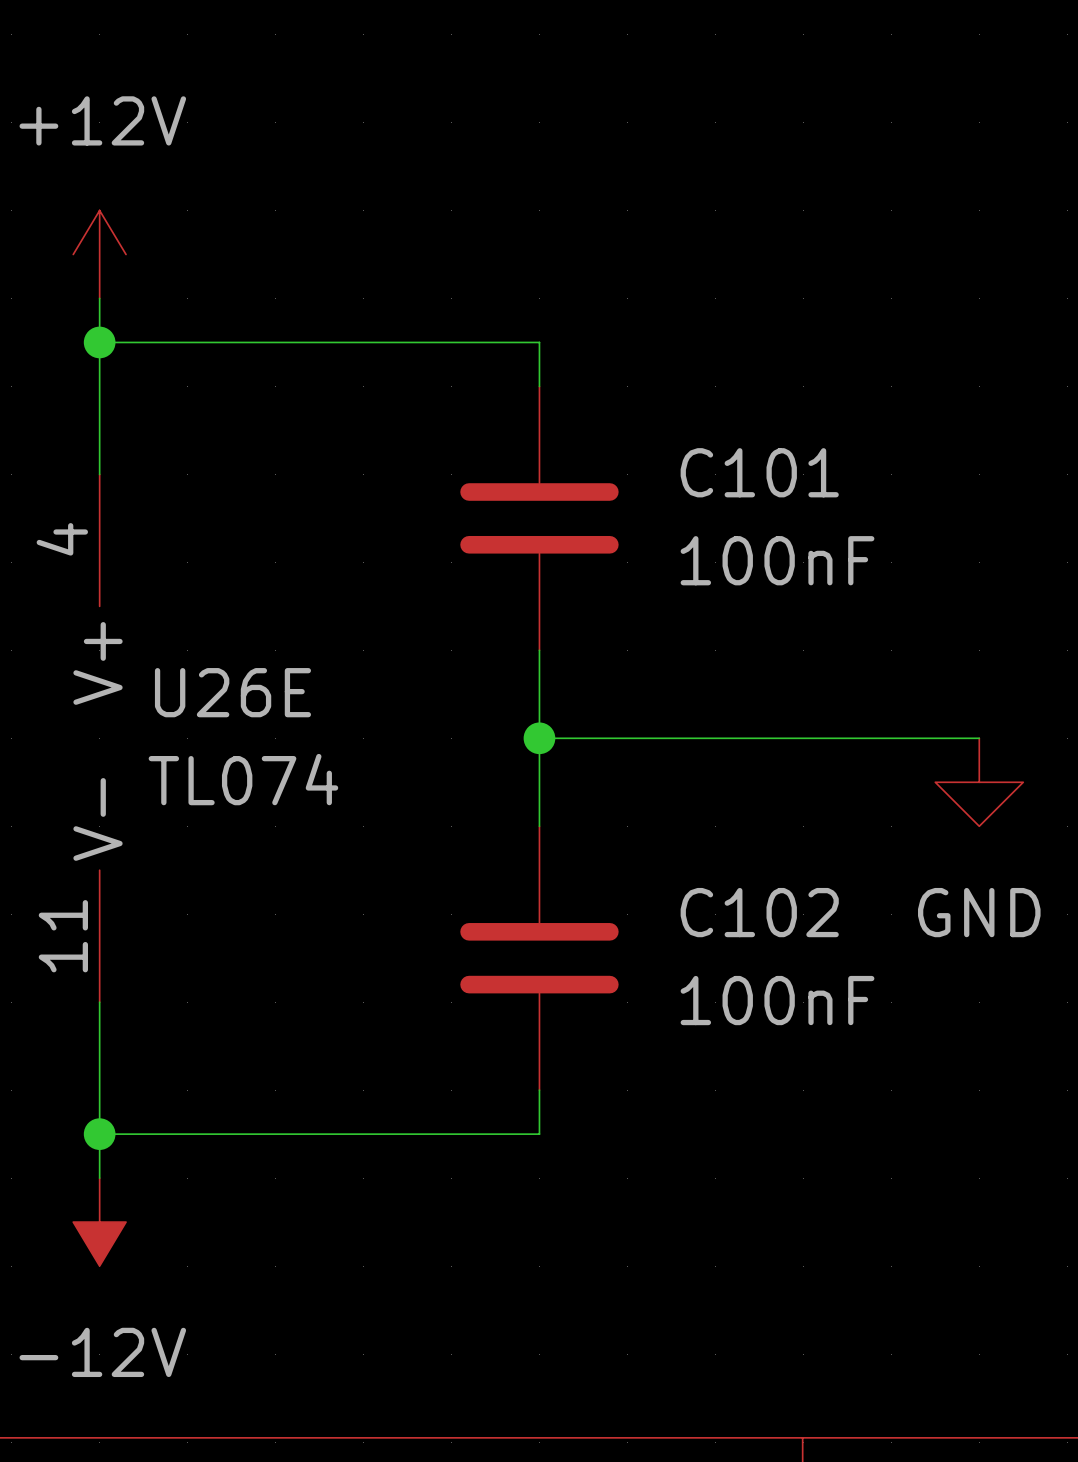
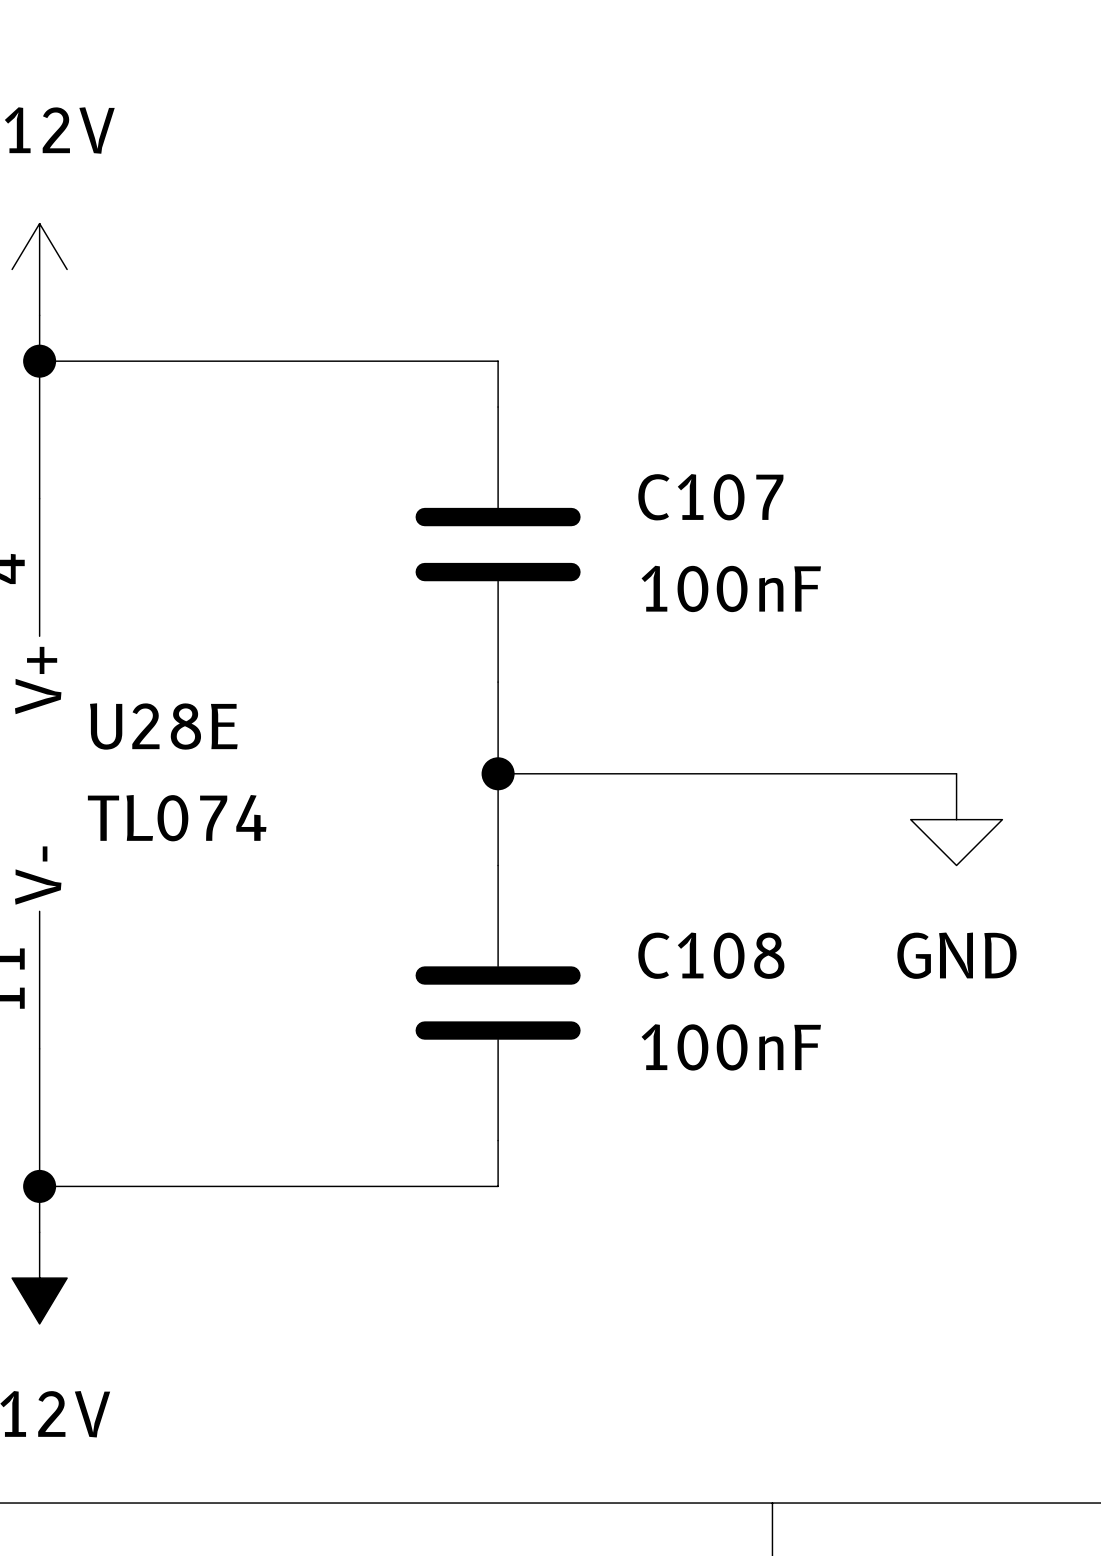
C101 name: C101 (759, 472) -> C107 (710, 497)
U26E name: U26E (232, 692) -> U28E (163, 726)
C102 name: C102 (759, 912) -> C108 (711, 955)

